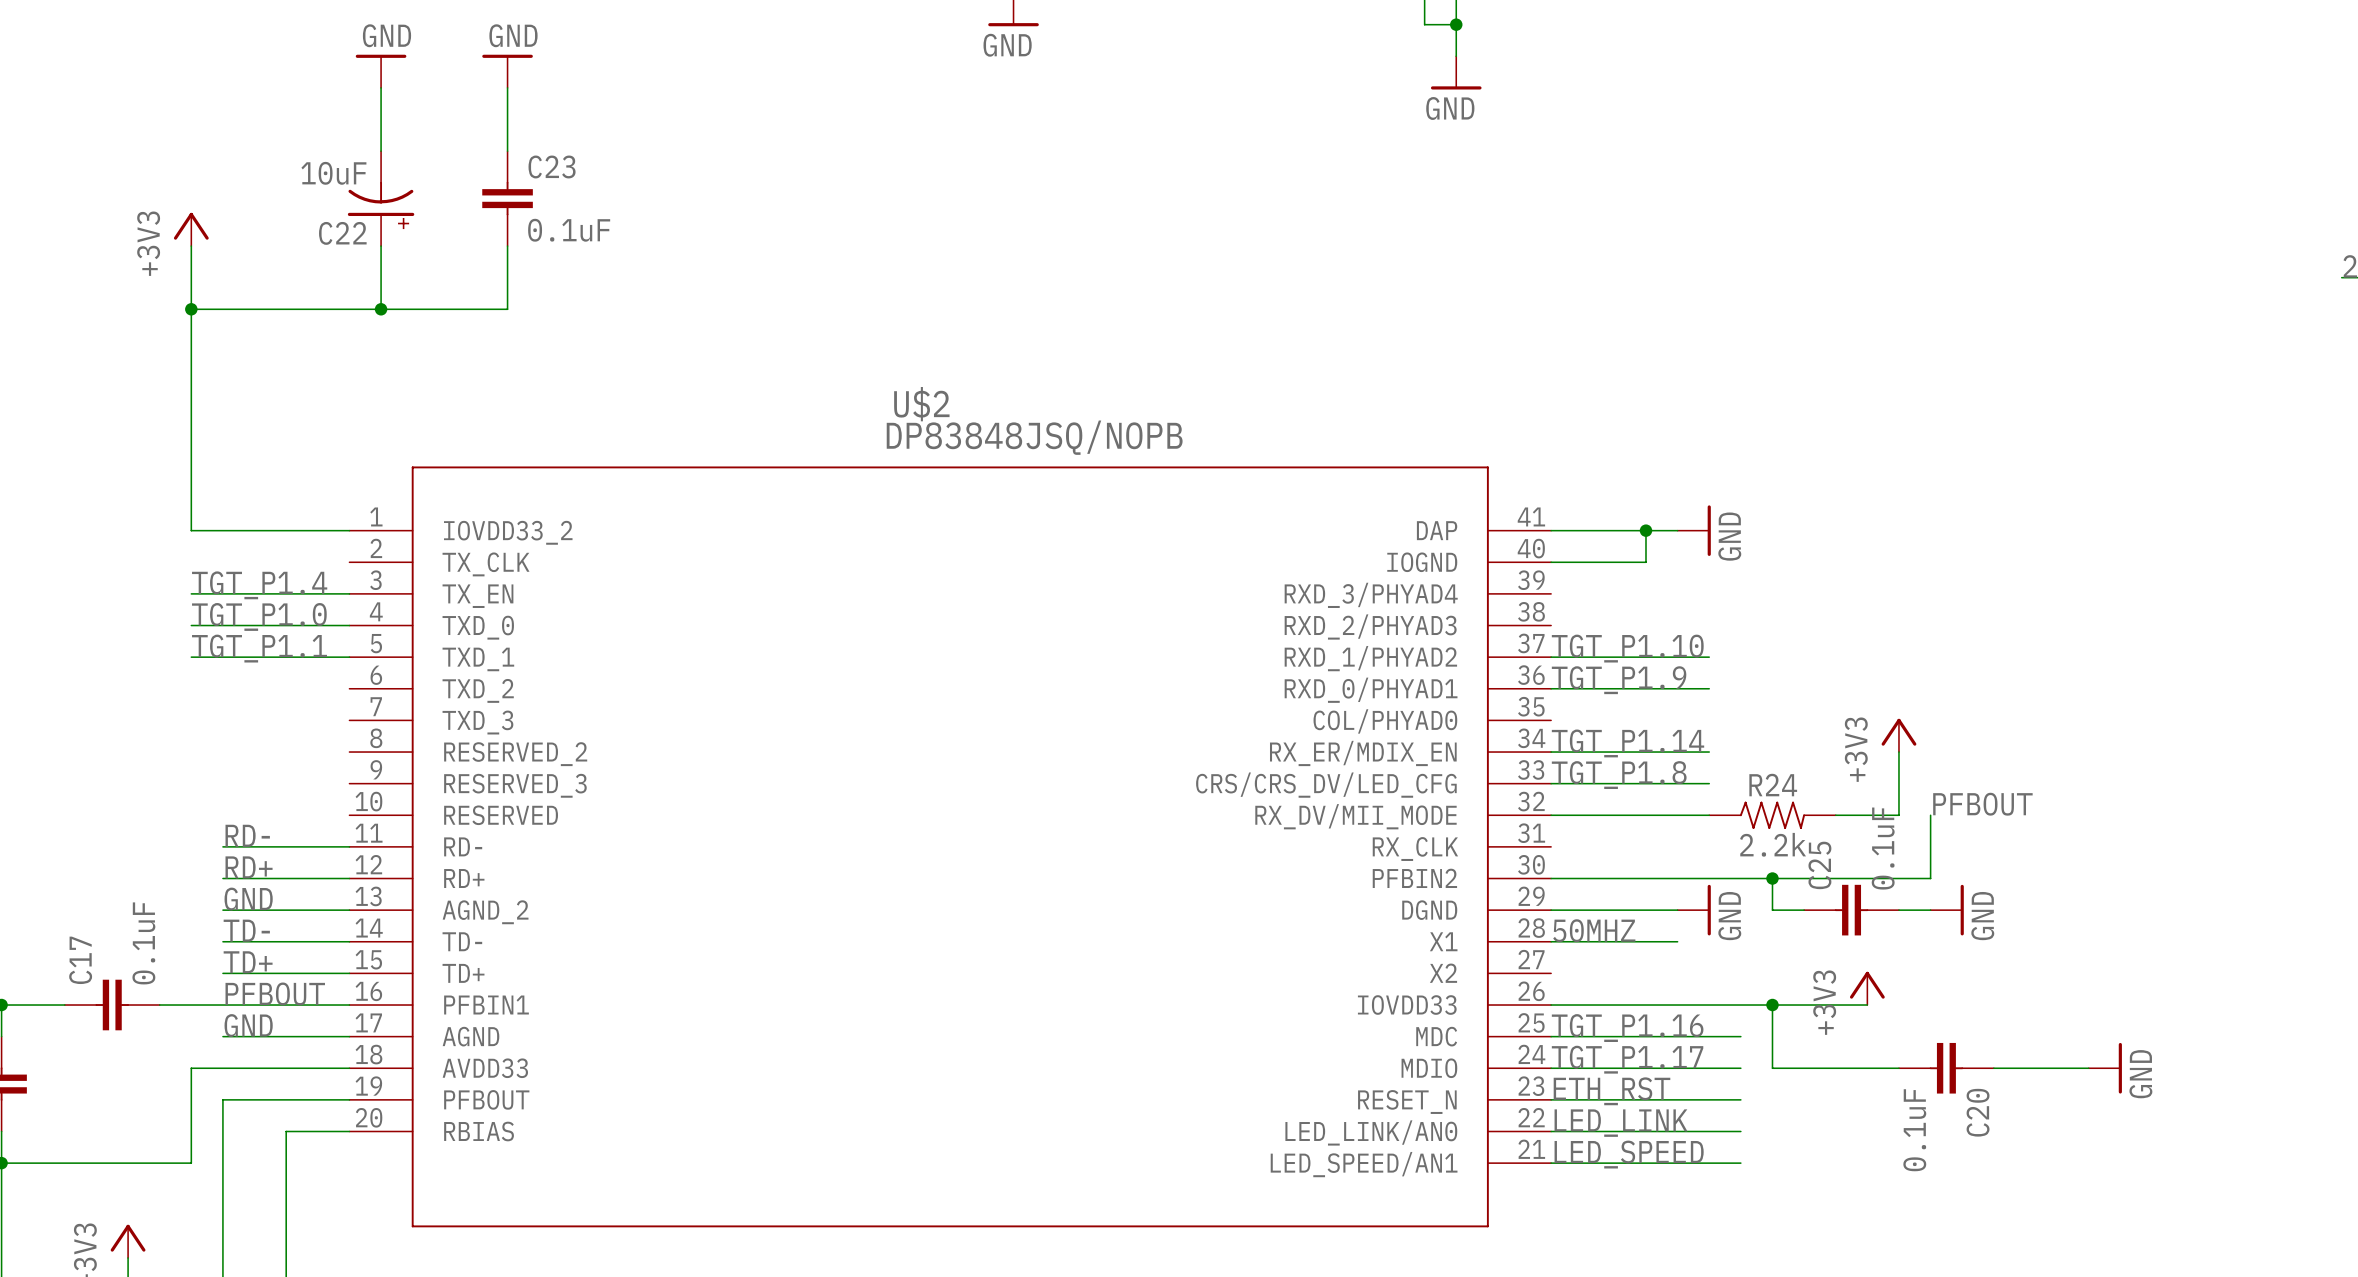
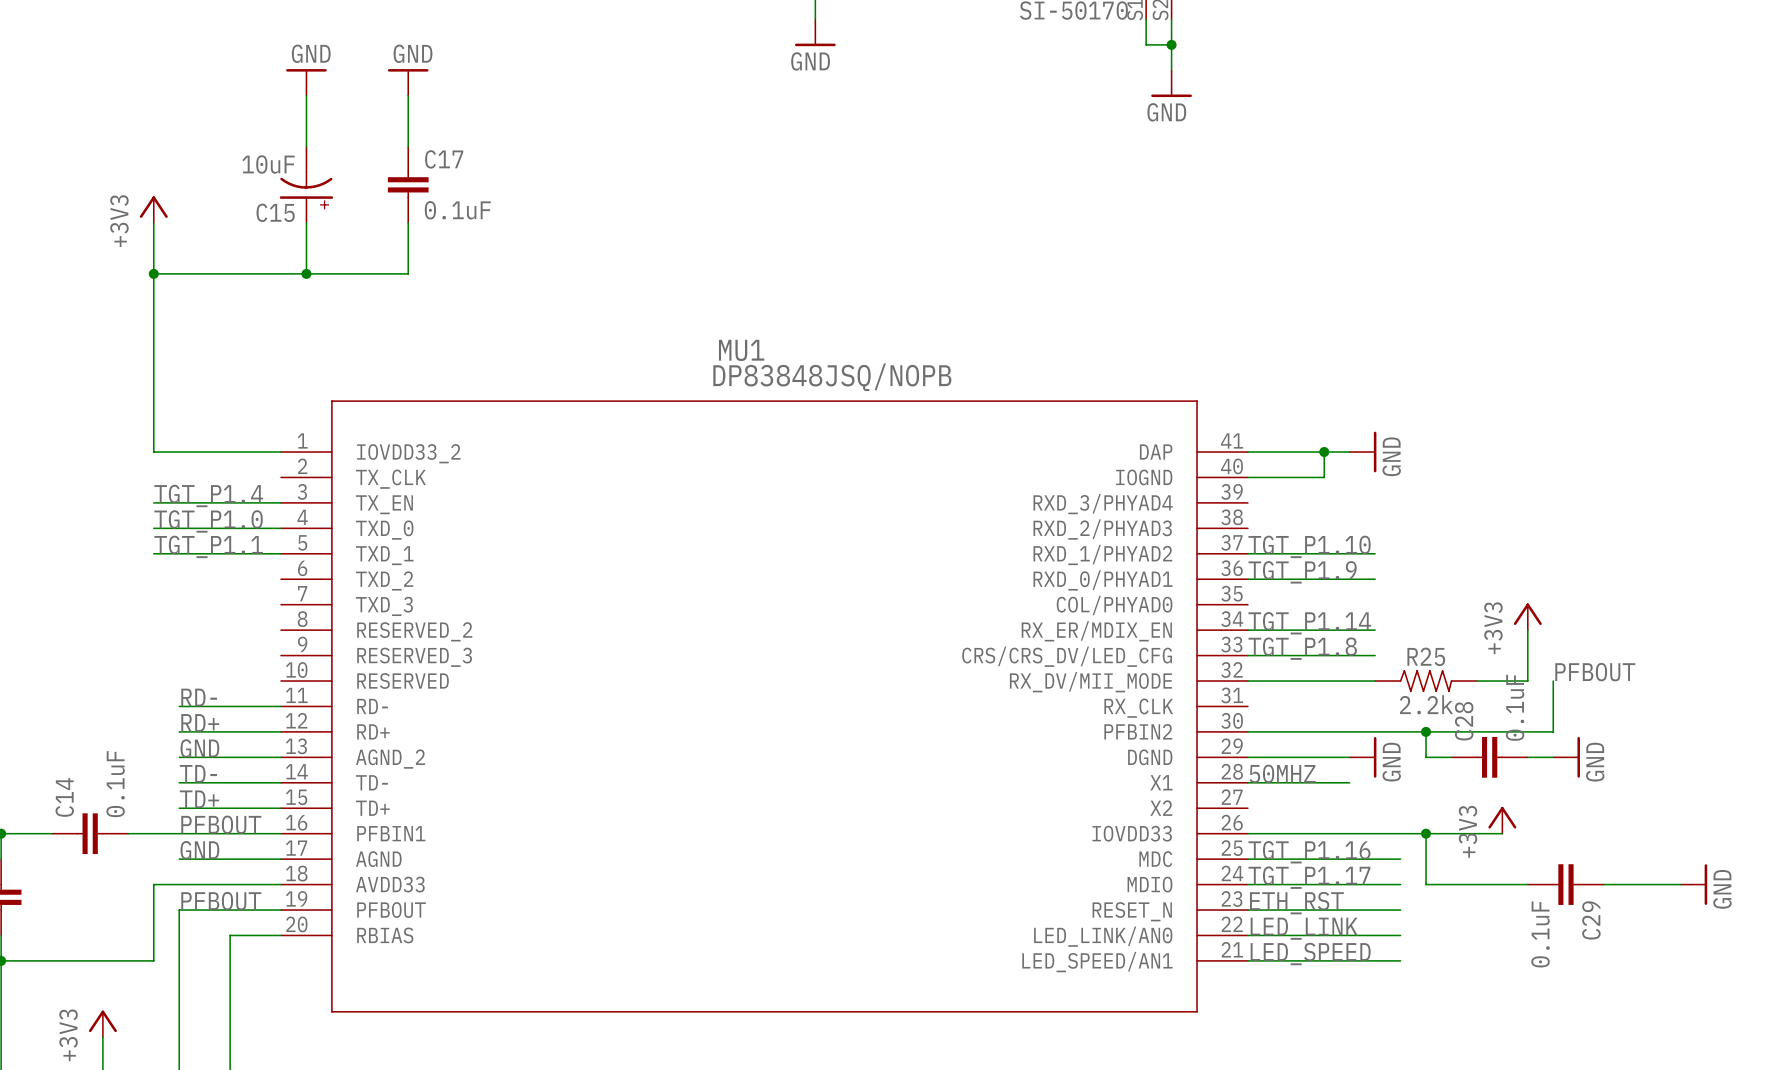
C23 name: C23 (552, 166) -> C17 (444, 159)
C22 name: C22 (342, 233) -> C15 (275, 212)
U$2 name: U$2 (921, 404) -> MU1 (741, 350)
R24 name: R24 (1773, 785) -> R25 (1426, 656)
C25 name: C25 (1819, 865) -> C28 (1464, 721)
C17 name: C17 (80, 960) -> C14 (64, 797)
label: none -> PFBOUT (221, 901)
C20 name: C20 (1978, 1112) -> C29 (1591, 920)

